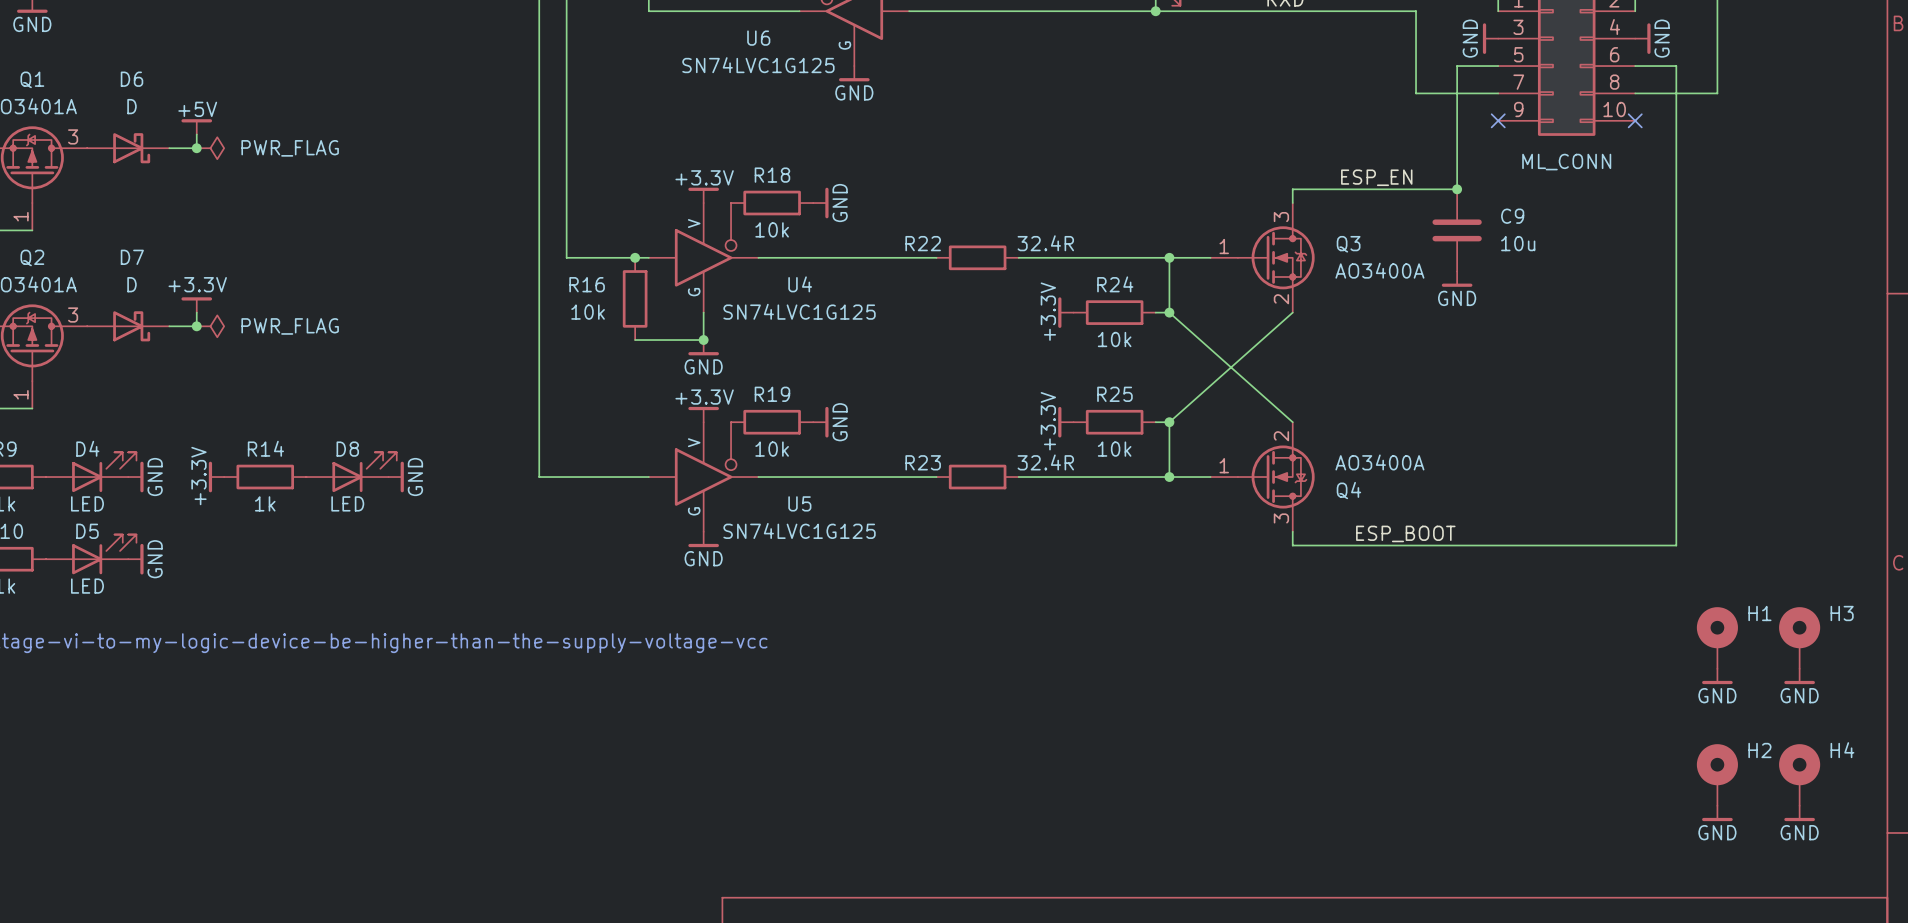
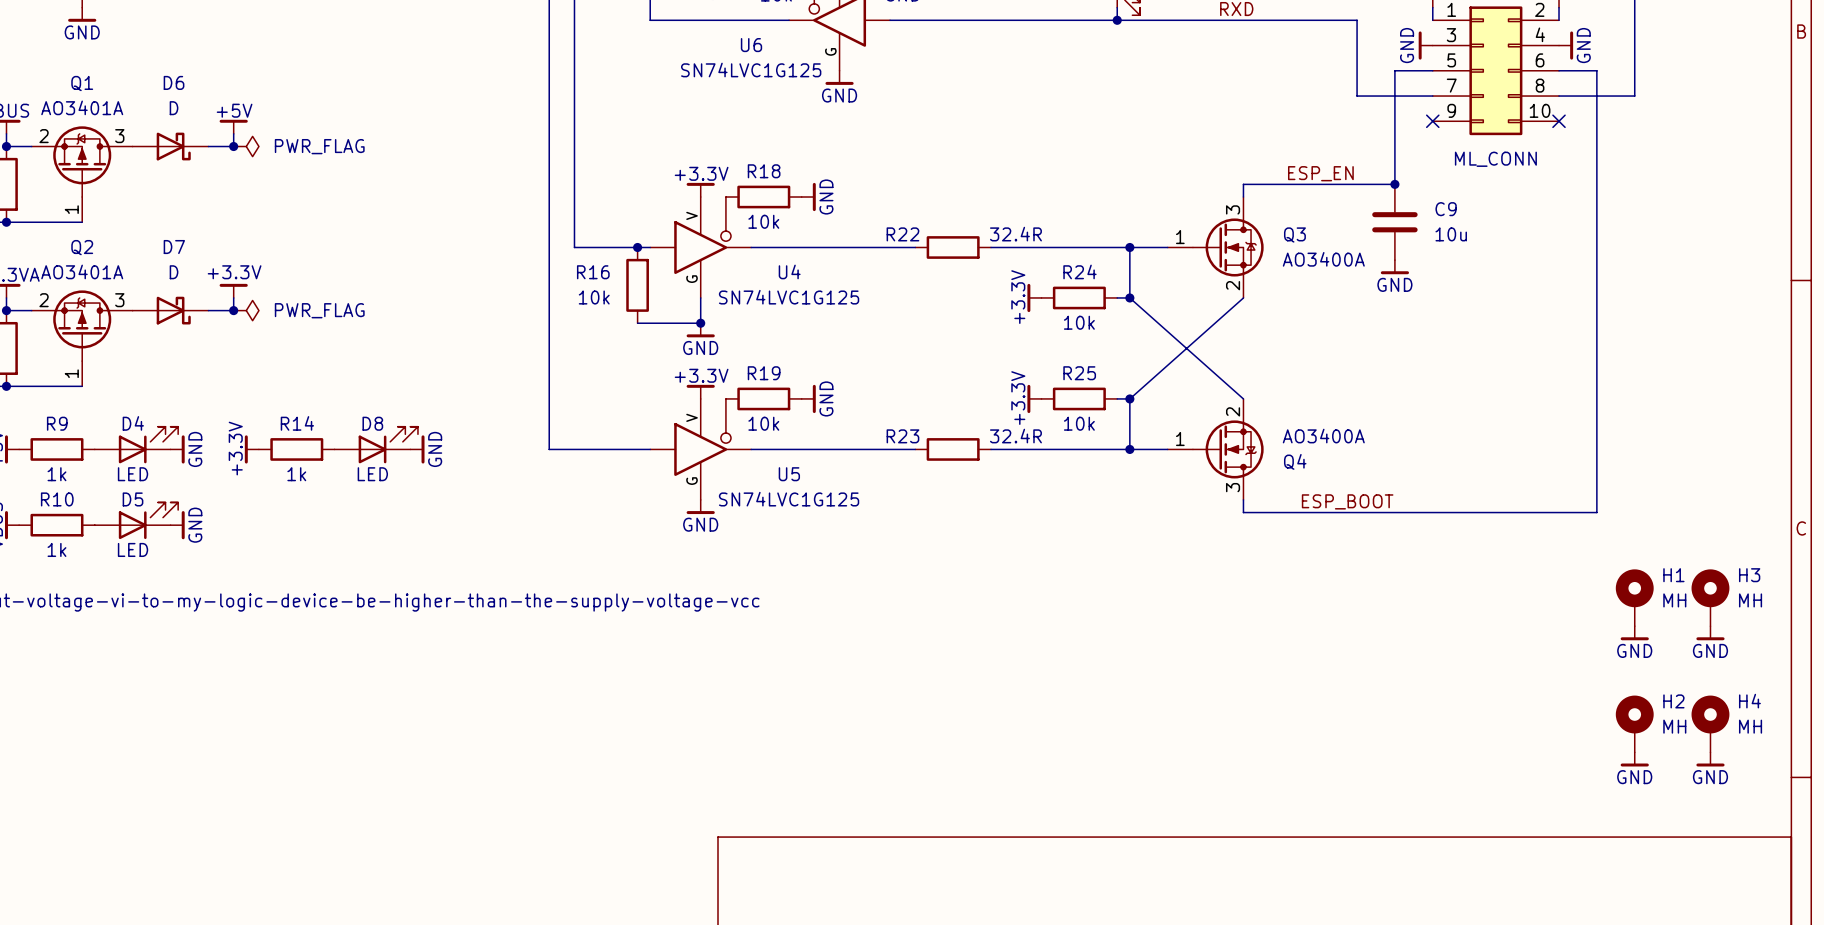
H1 value: none -> MH (1674, 600)
H3 value: none -> MH (1750, 600)
H2 value: none -> MH (1674, 726)
H4 value: none -> MH (1750, 726)

